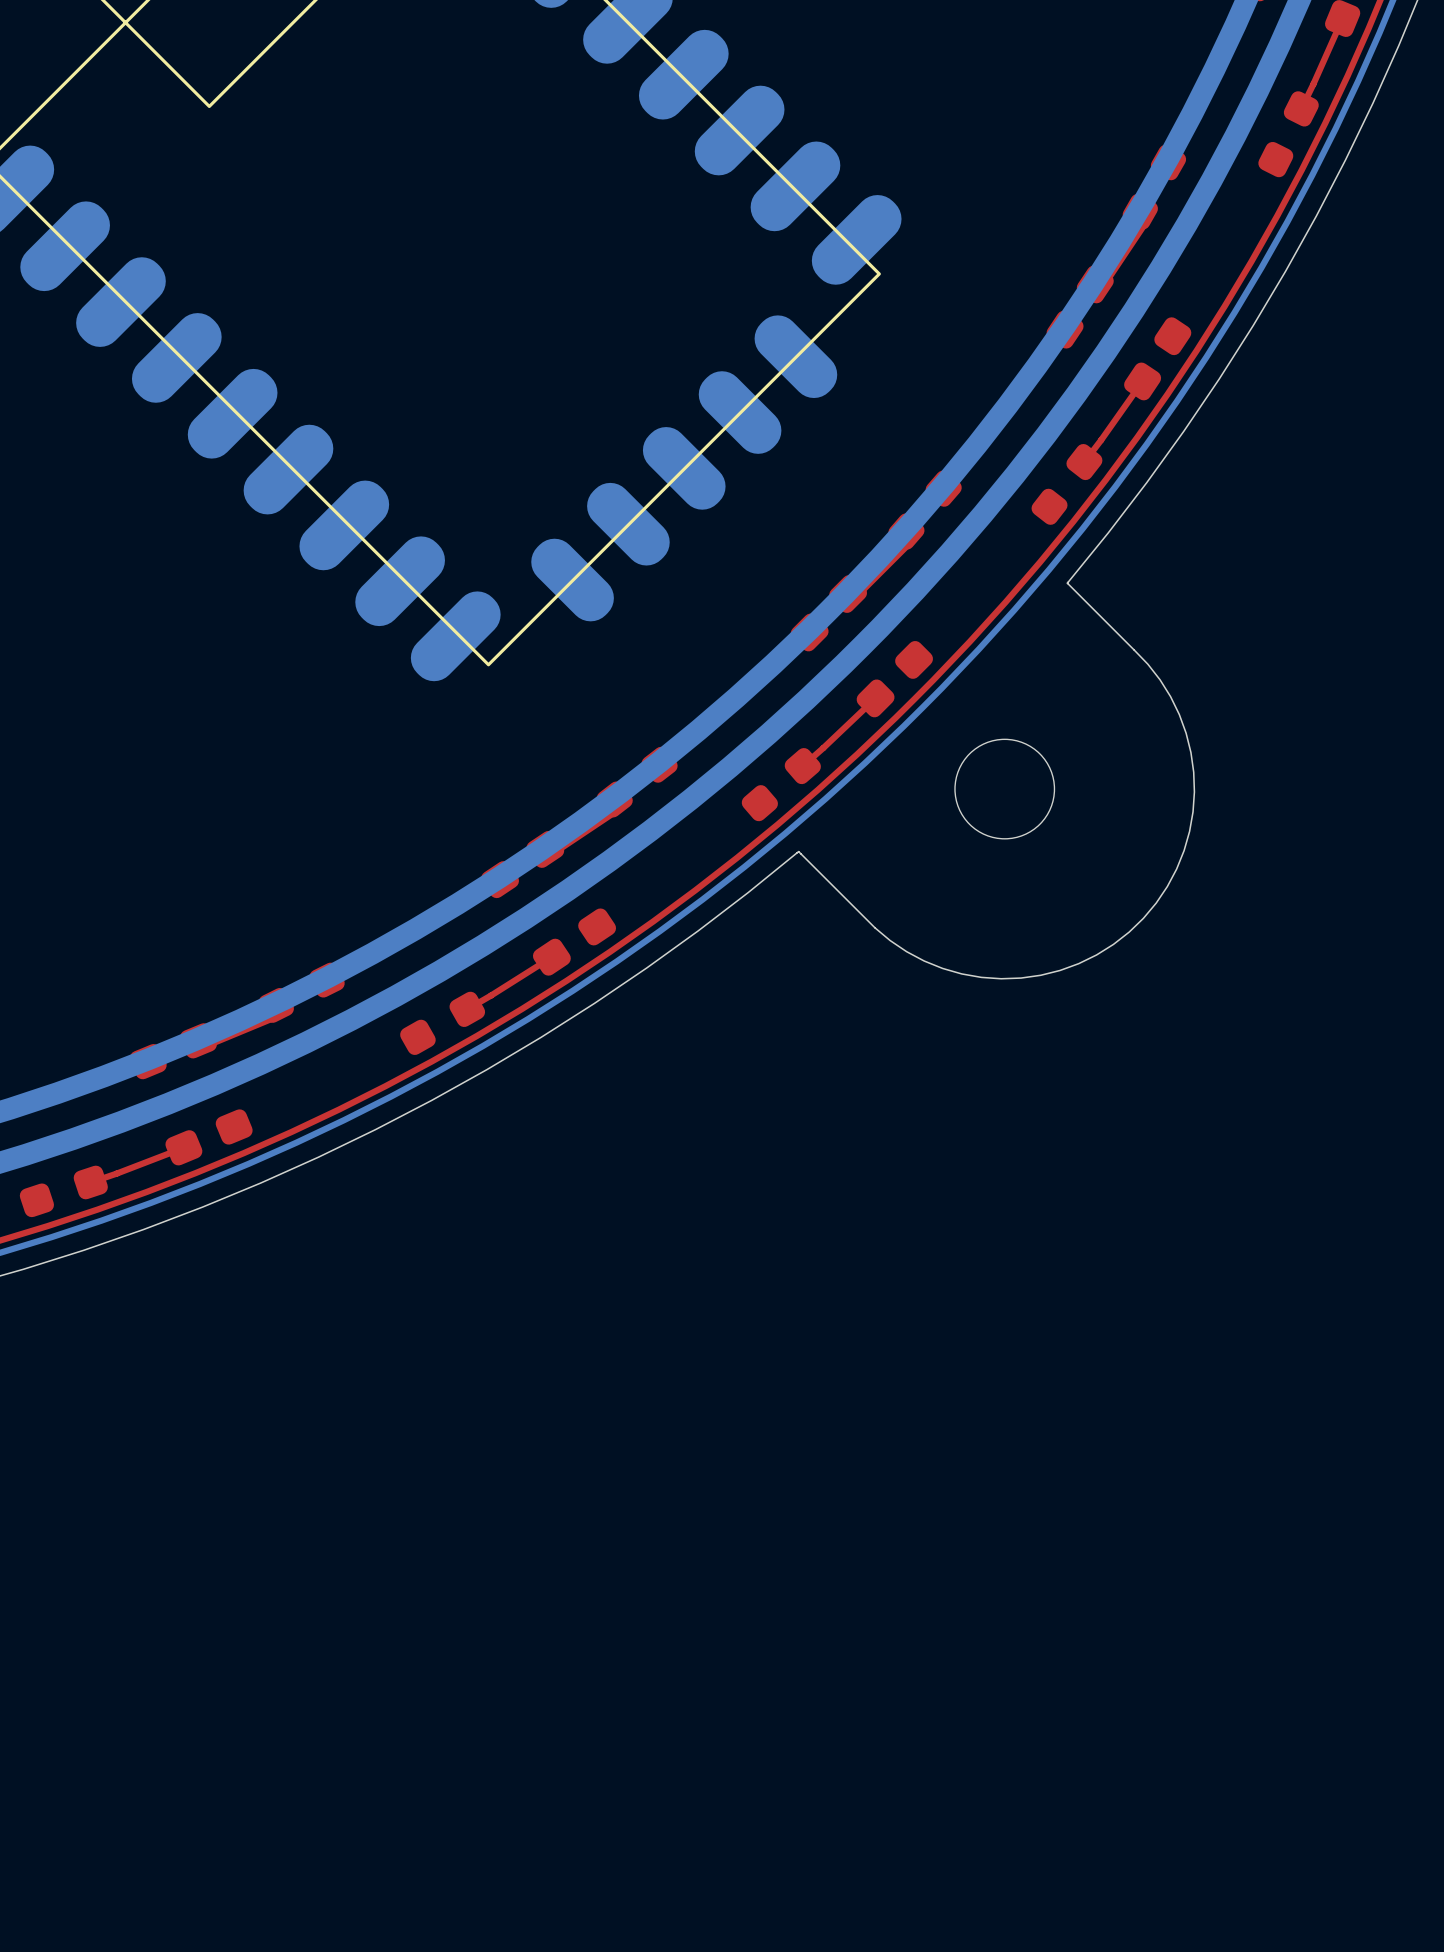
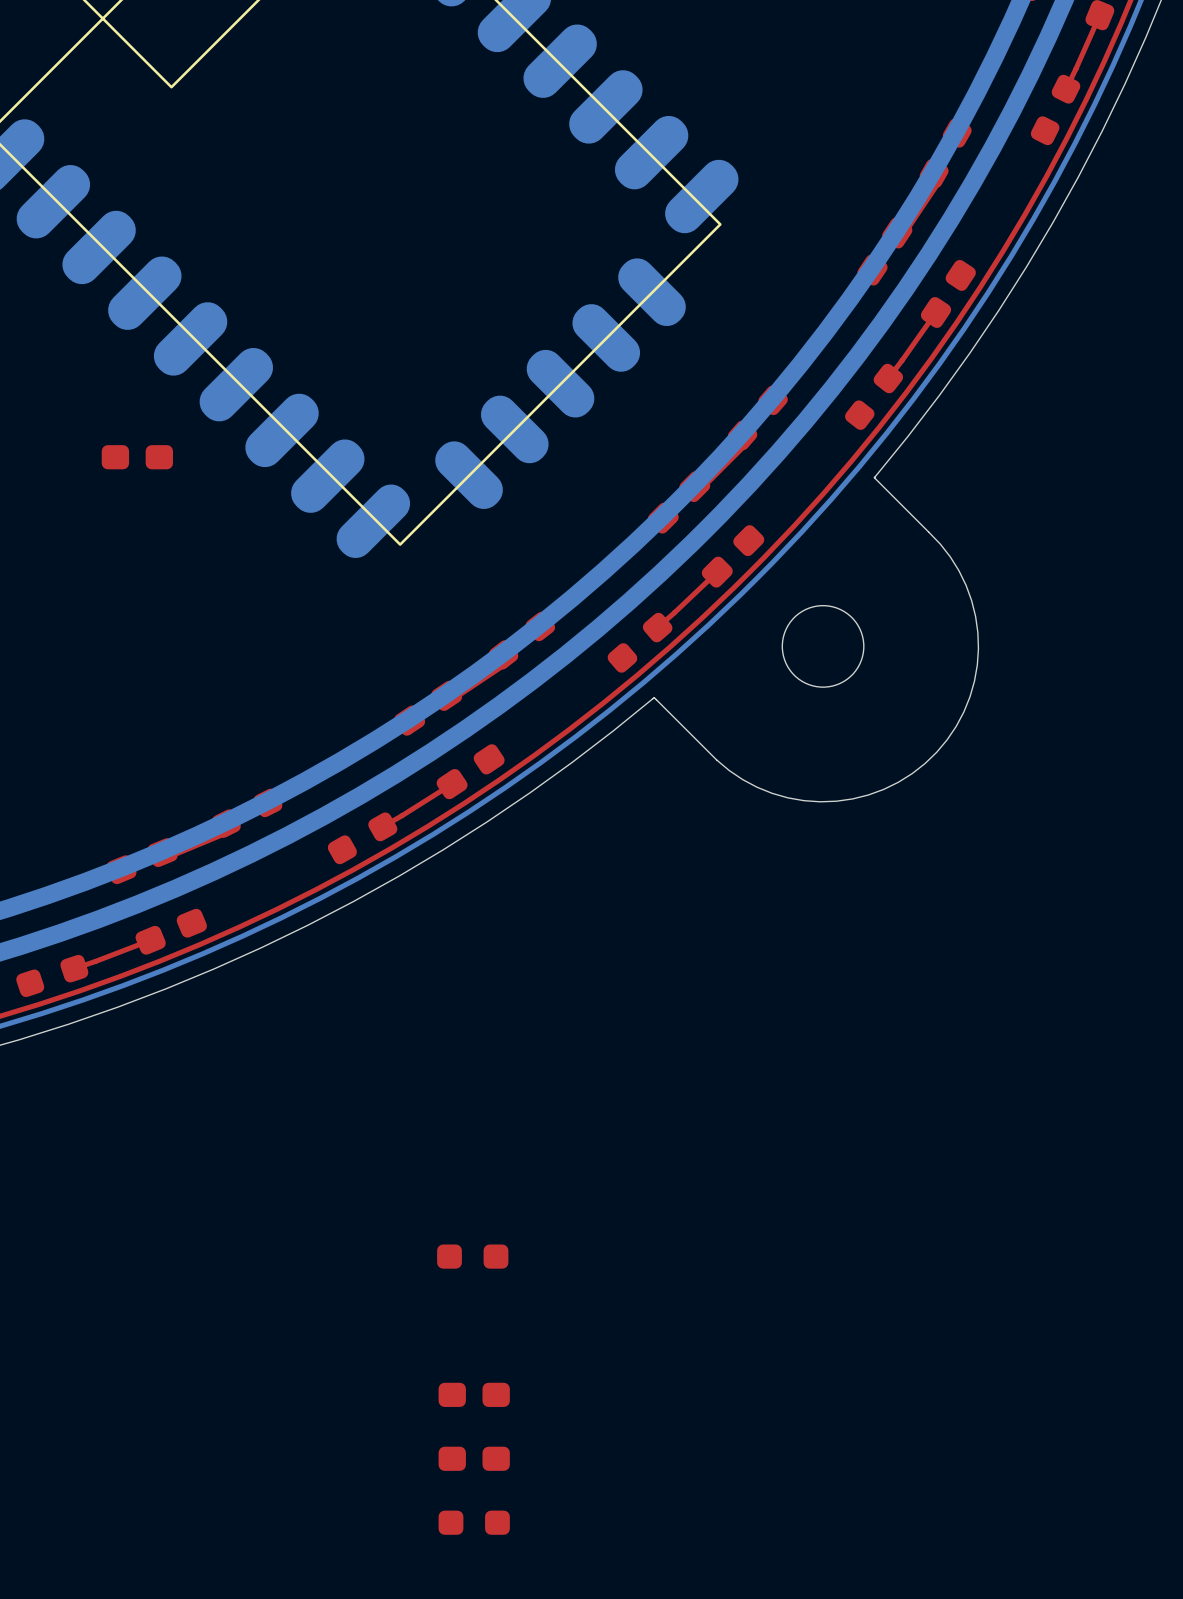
part: none -> (137, 457)
part: none -> (472, 1256)
part: none -> (474, 1394)
part: none -> (474, 1458)
part: none -> (474, 1522)

